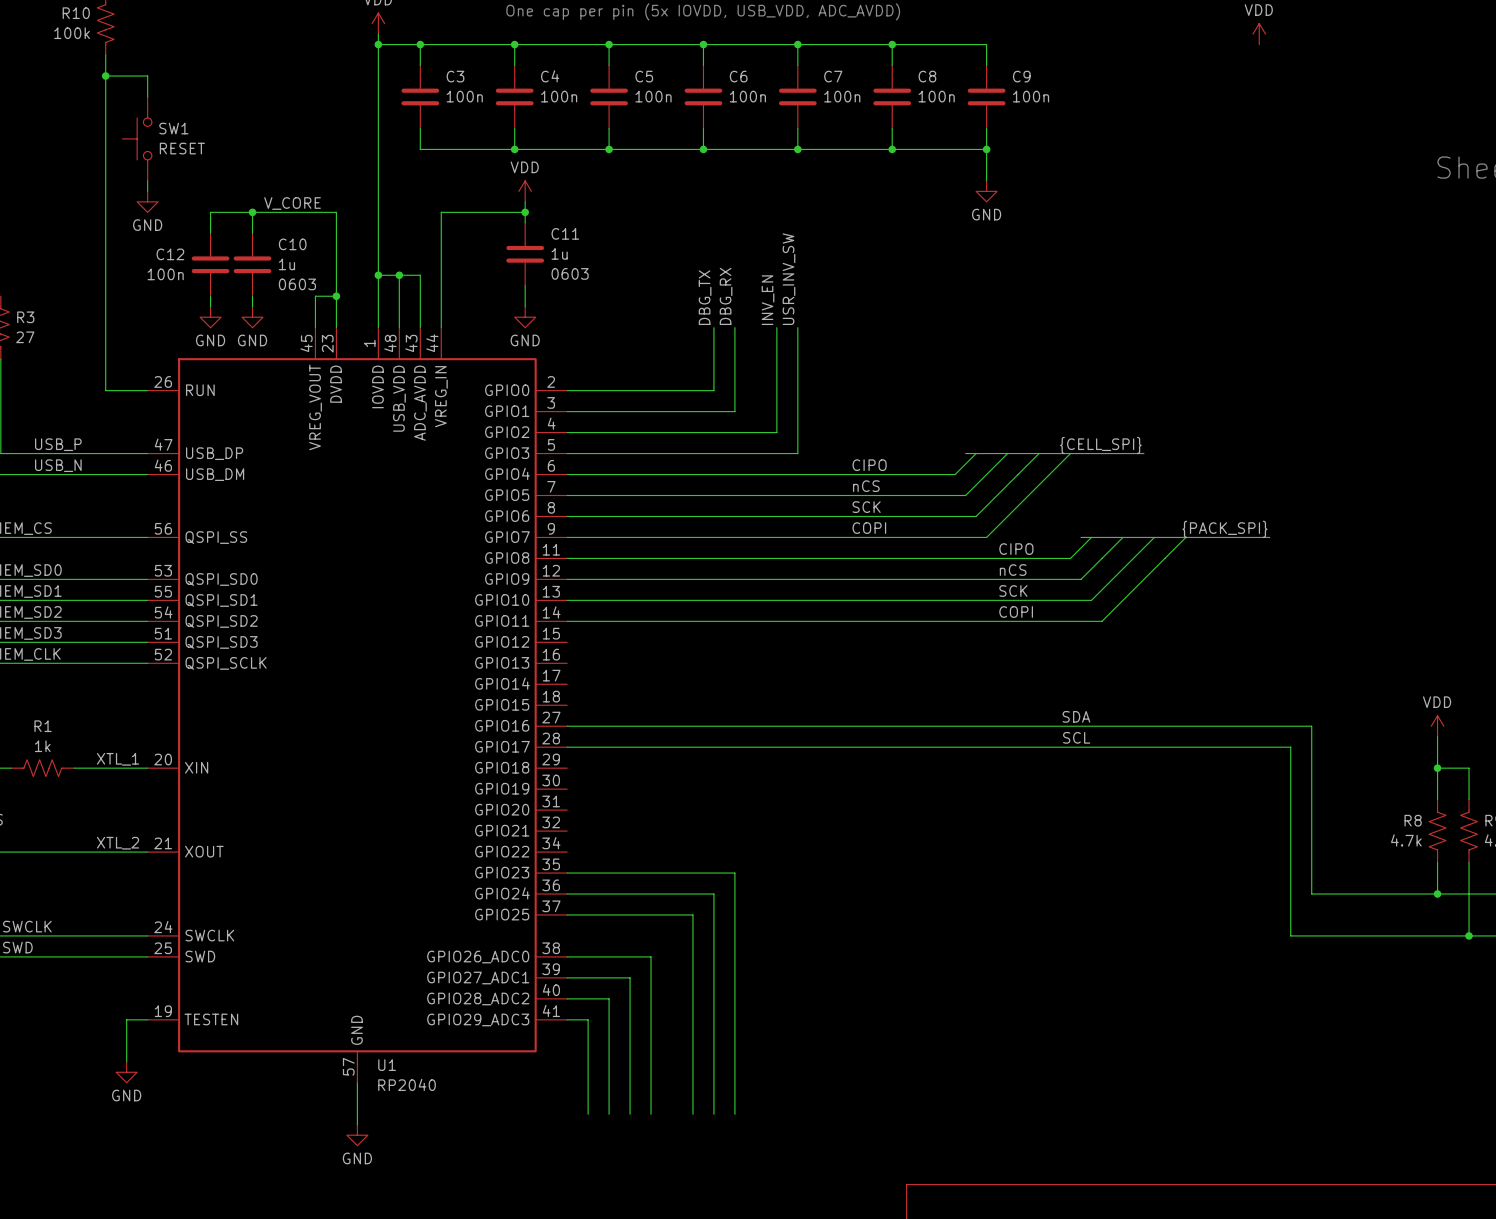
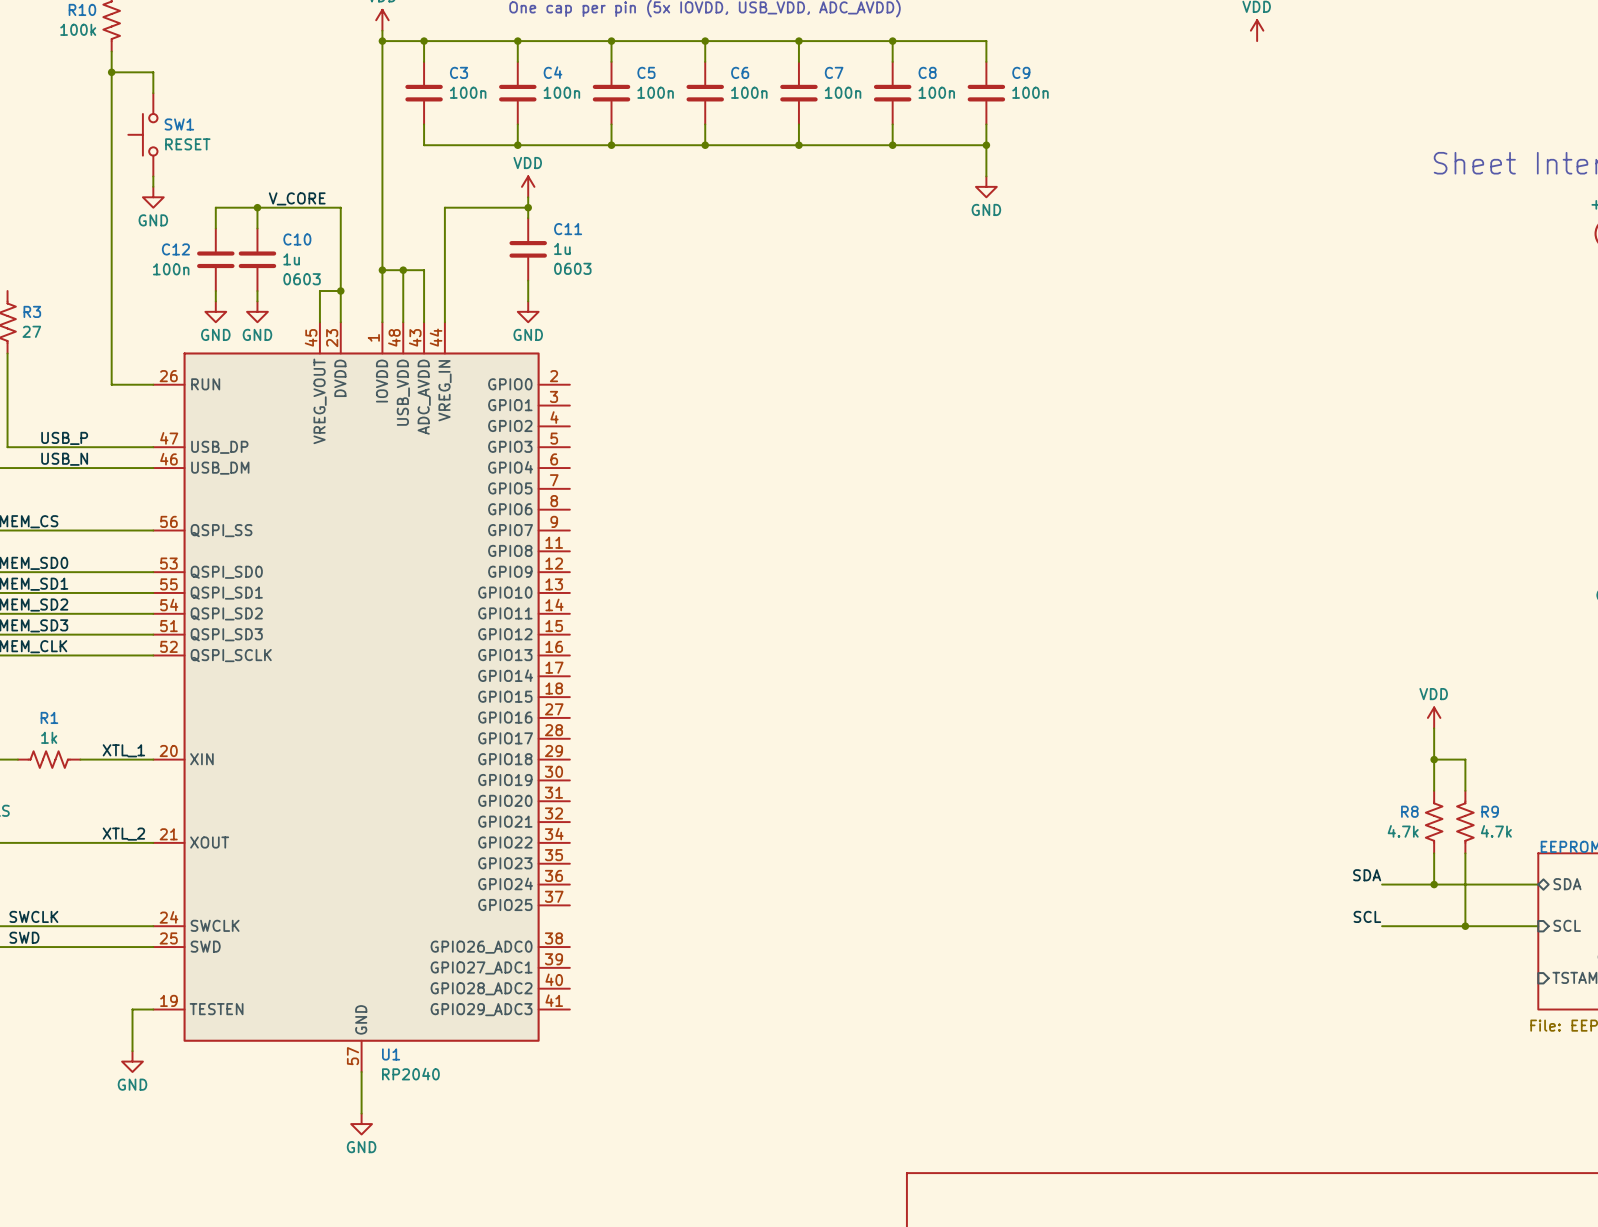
label: USR_INV_SW (788, 279) -> none
label: DBG_RX (726, 296) -> none
label: DBG_TX (705, 297) -> none
label: INV_EN (768, 300) -> none
wire: (713, 327) (713, 390) (567, 390) -> none
wire: (734, 327) (734, 411) (567, 411) -> none
wire: (776, 327) (776, 432) (567, 432) -> none
wire: (797, 327) (797, 453) (567, 453) -> none
label: {CELL_SPI} (1100, 445) -> none
bus: (965, 453) (1143, 453) -> none
wire: (976, 453) (955, 474) (567, 474) -> none
wire: (1007, 453) (965, 495) (567, 495) -> none
wire: (1039, 453) (976, 516) (567, 516) -> none
wire: (1070, 453) (986, 537) (567, 537) -> none
label: CIPO (869, 465) -> none
label: nCS (866, 486) -> none
label: SCK (866, 507) -> none
label: COPI (869, 528) -> none
label: {PACK_SPI} (1224, 529) -> none
bus: (1080, 537) (1269, 537) -> none
wire: (1091, 537) (1070, 558) (567, 558) -> none
wire: (1122, 537) (1080, 579) (567, 579) -> none
wire: (1154, 537) (1091, 600) (567, 600) -> none
wire: (1185, 537) (1101, 621) (567, 621) -> none
label: CIPO (1016, 549) -> none
label: nCS (1013, 570) -> none
label: SCK (1013, 591) -> none
label: COPI (1016, 611) -> none
label: SDA (1076, 716) -> none
wire: (567, 726) (1311, 726) (1311, 894) (1385, 894) -> none
label: SCL (1076, 737) -> none
wire: (567, 747) (1290, 747) (1290, 935) (1385, 935) -> none
wire: (567, 873) (734, 873) (734, 1114) -> none
label: none -> SDA (1367, 875)
wire: (567, 894) (713, 894) (713, 1114) -> none
wire: (567, 914) (692, 914) (692, 1114) -> none
label: none -> SCL (1367, 916)
wire: (567, 956) (651, 956) (651, 1114) -> none
wire: (567, 977) (630, 977) (630, 1114) -> none
wire: (567, 998) (609, 998) (609, 1114) -> none
wire: (567, 1019) (588, 1019) (588, 1114) -> none

